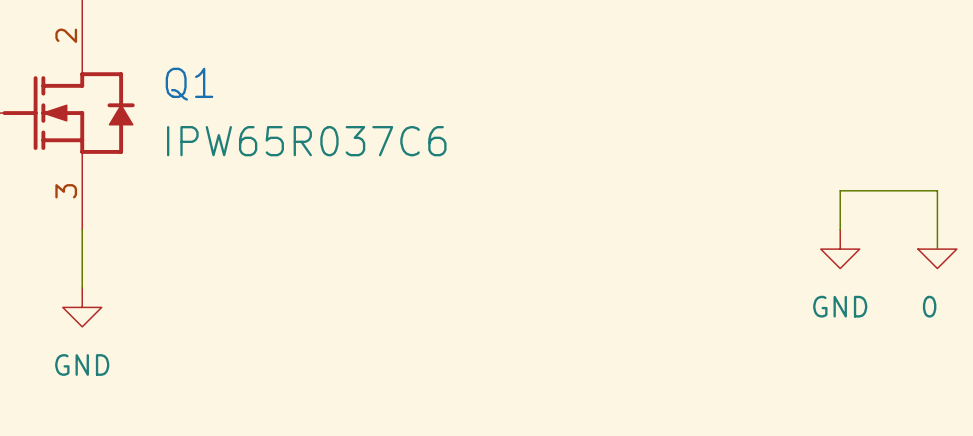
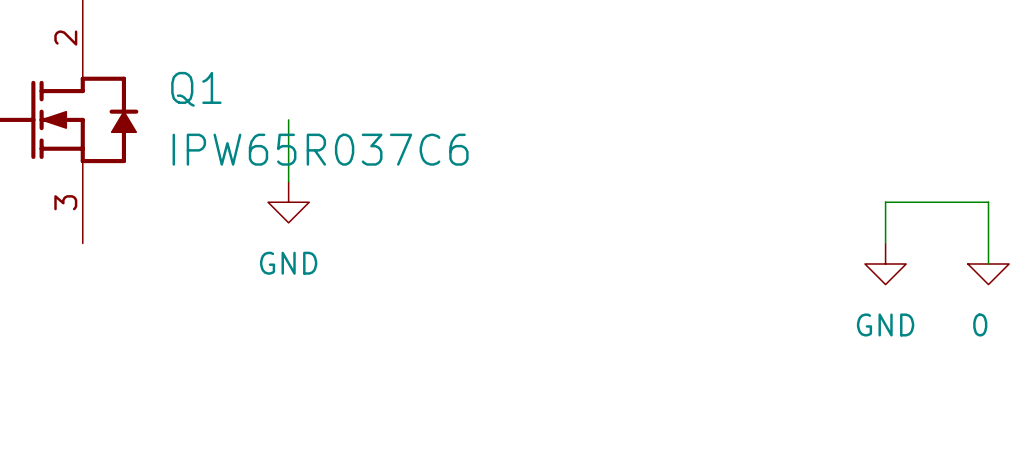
wire: (82, 229) (82, 287) -> (288, 119) (288, 181)
power symbol position: GND (82, 307) -> GND (288, 202)

